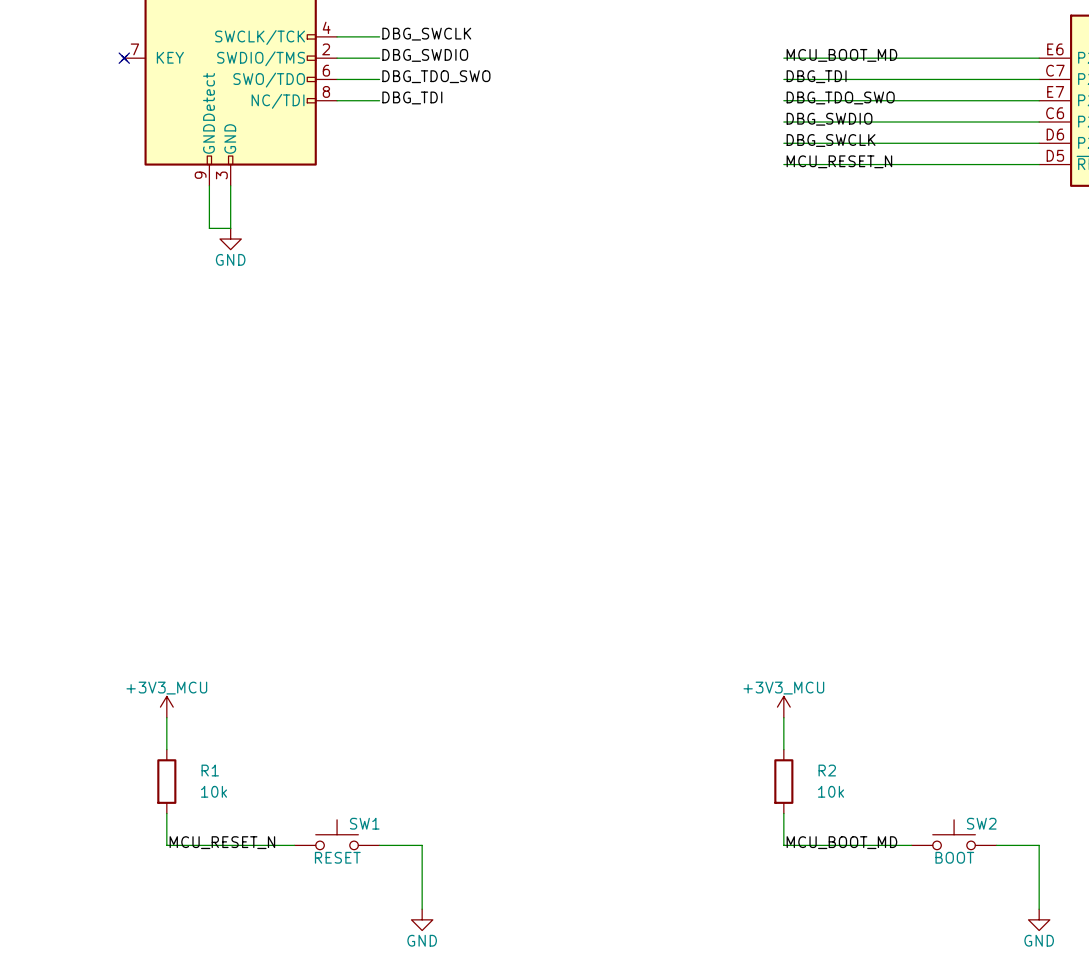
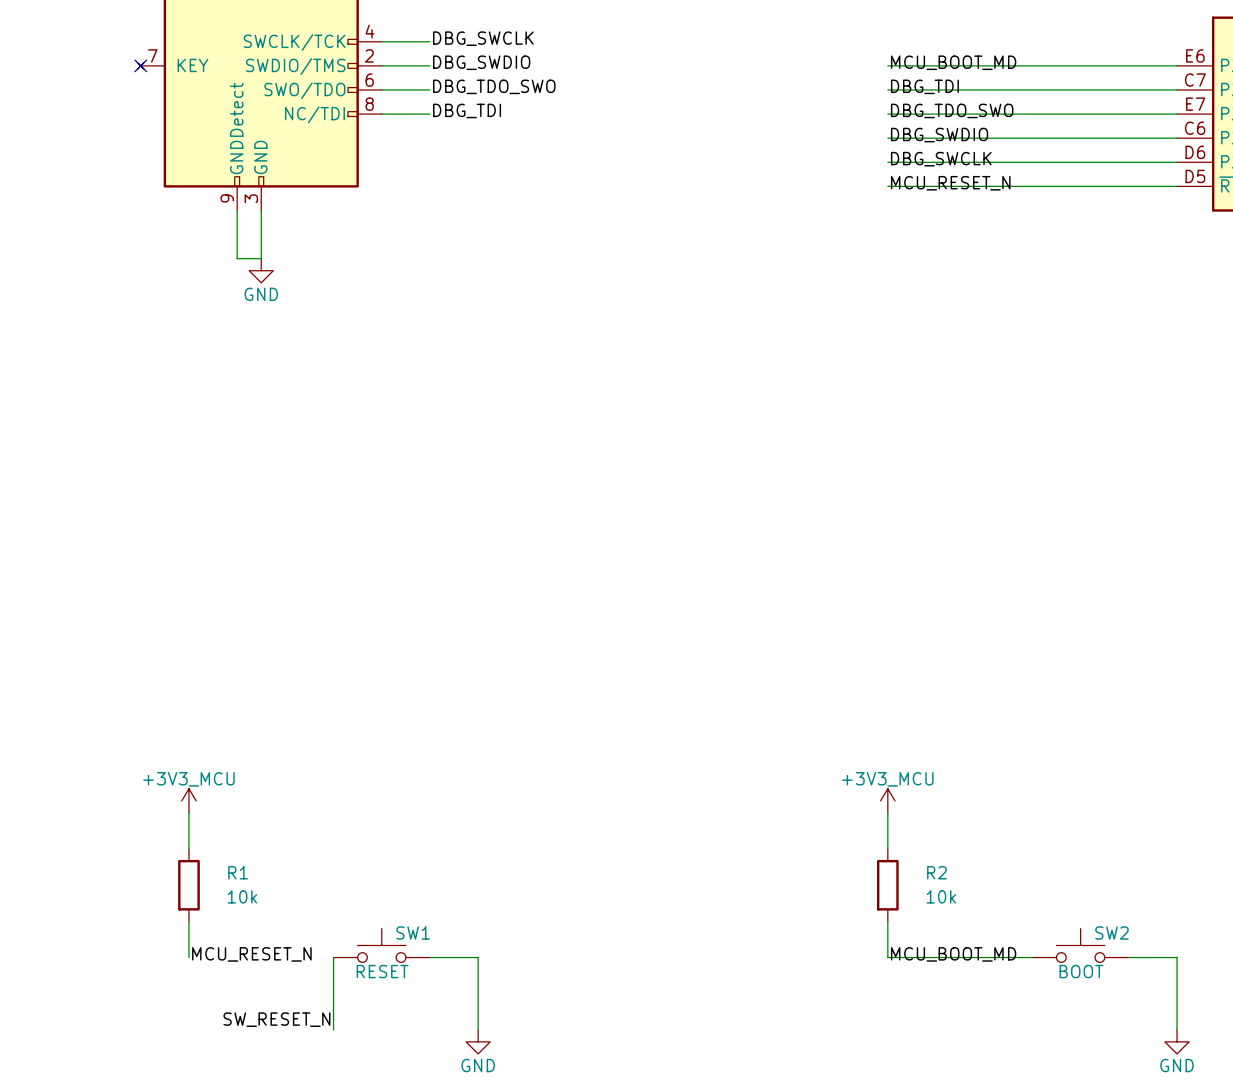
wire: (166, 845) (294, 845) -> (333, 1029) (333, 957)
label: none -> SW_RESET_N (276, 1019)

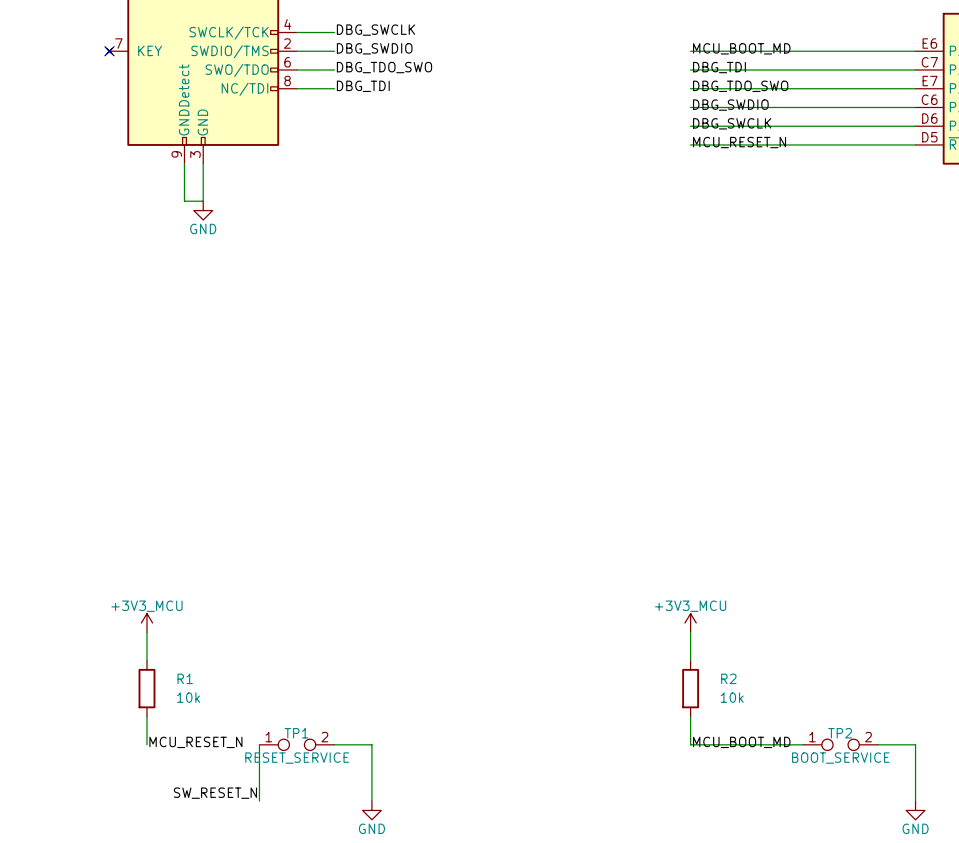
SW1: RESET (381, 945) -> none
SW2: BOOT (1080, 945) -> none
TP1: none -> RESET_SERVICE (296, 744)
TP2: none -> BOOT_SERVICE (840, 744)

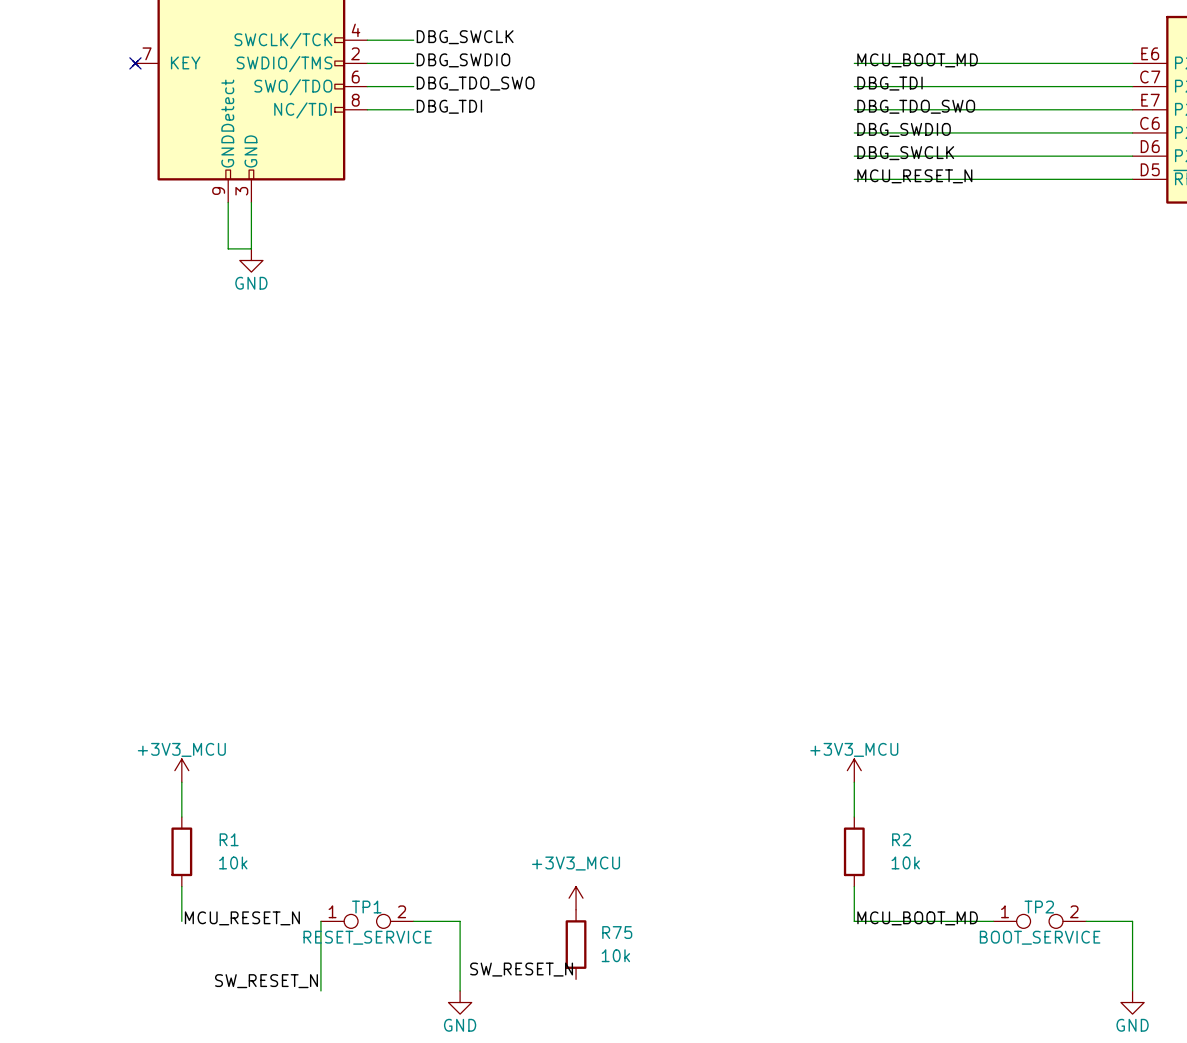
power symbol: none -> +3V3_MCU (576, 898)
R75: none -> 10k (576, 944)
label: none -> SW_RESET_N (521, 969)

